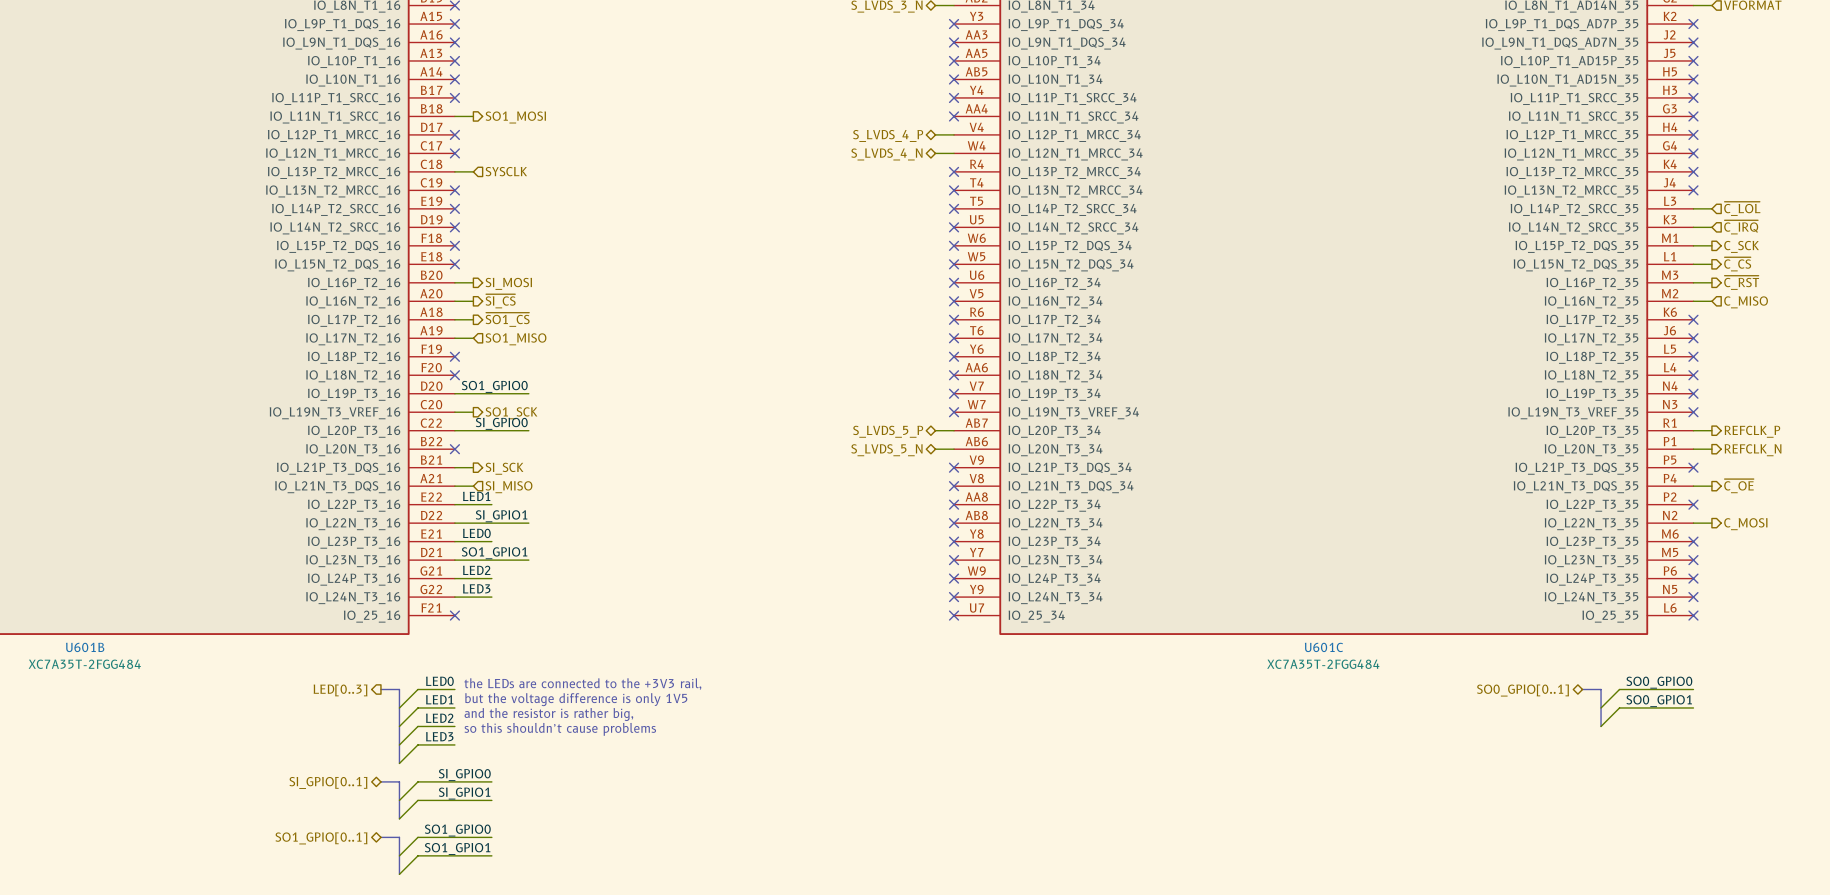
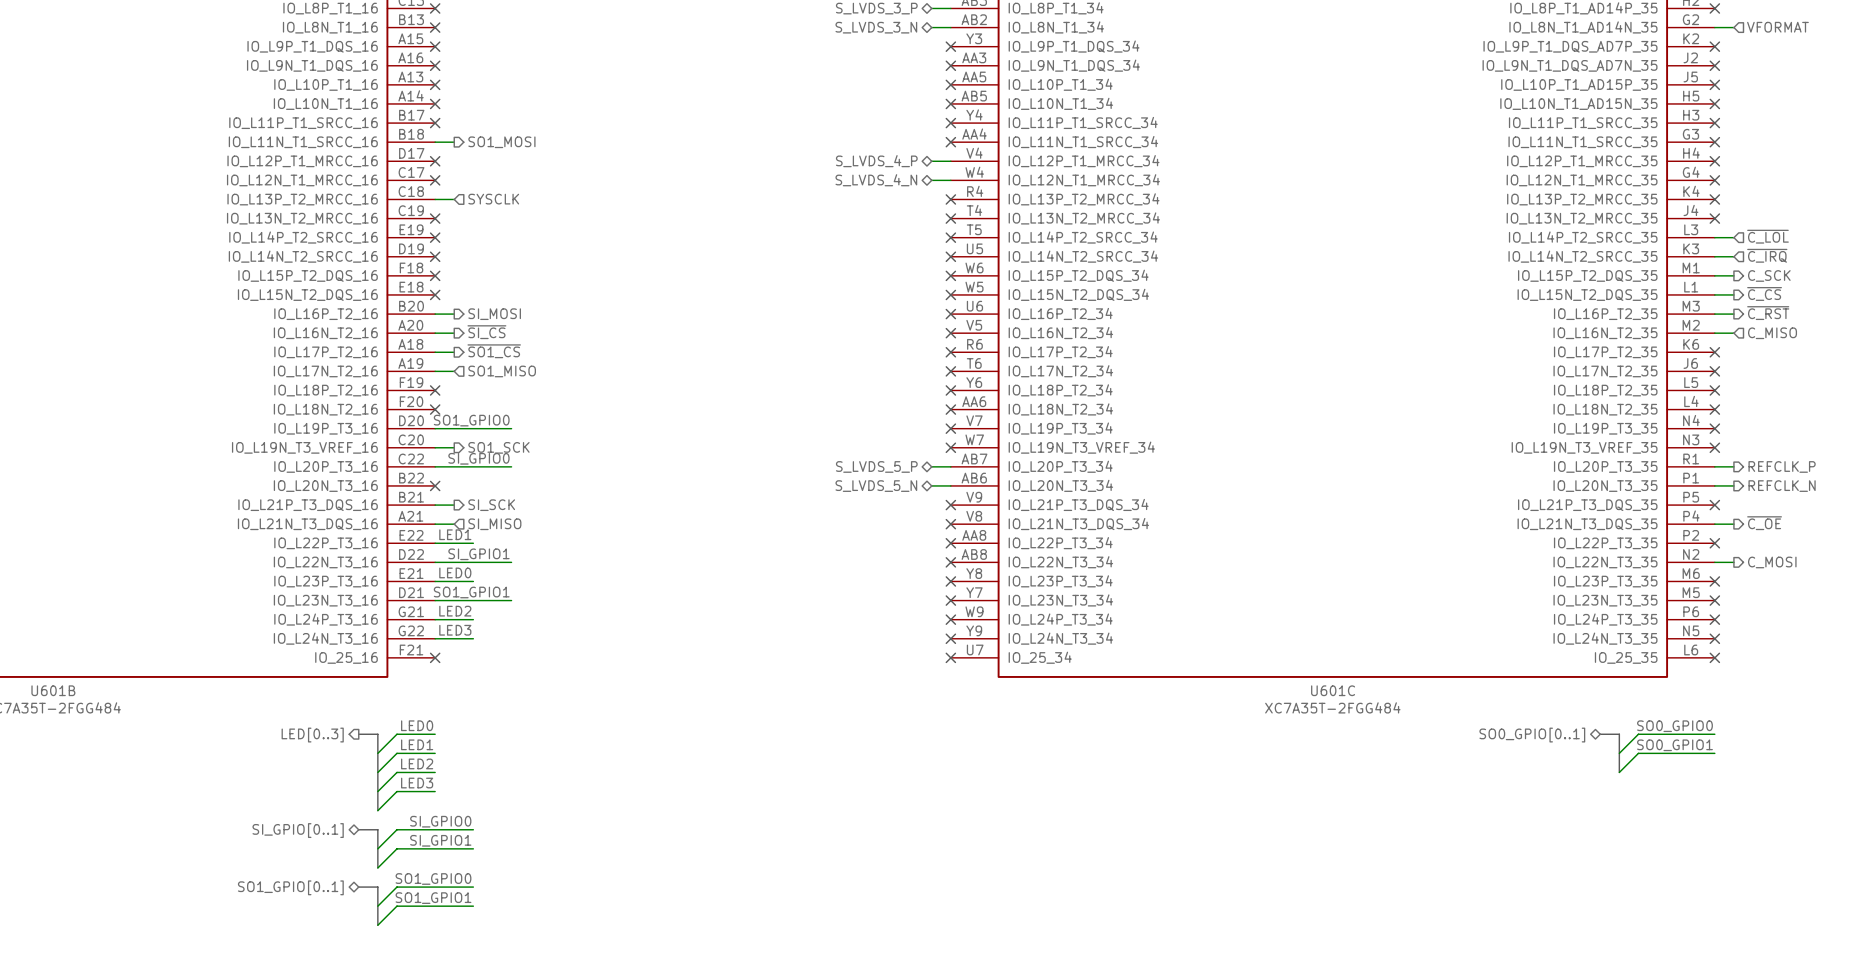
text: the LEDs are connected to the +3V3 rail, (582, 684) -> none
text: but the voltage difference is only 1V5 (576, 699) -> none
text: and the resistor is rather big, (548, 714) -> none
text: so this shouldn’t cause problems (560, 729) -> none

